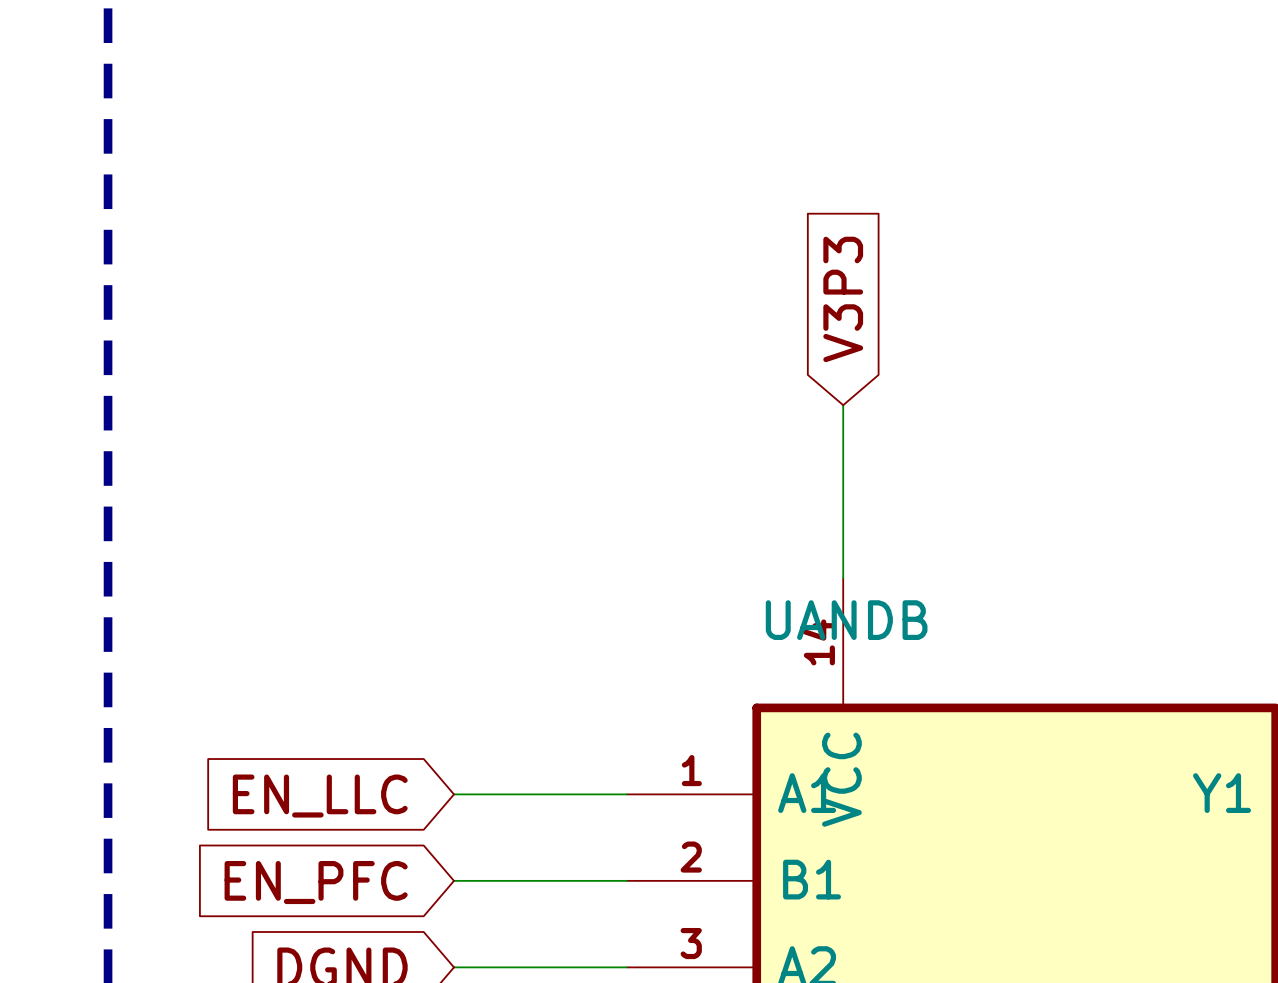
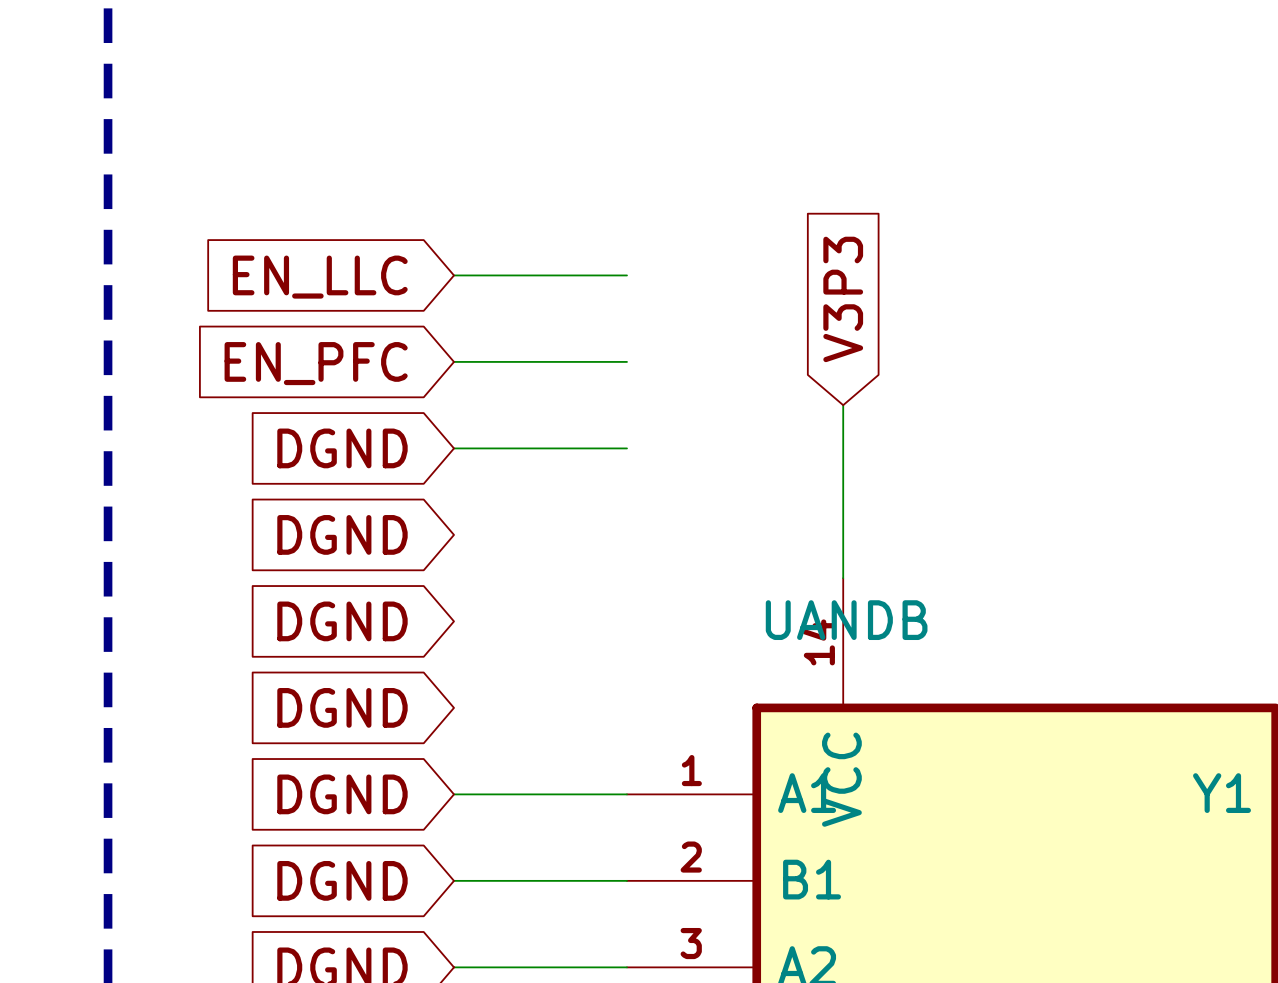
wire: none -> (454, 275) (626, 275)
global label: none -> EN_LLC (320, 277)
wire: none -> (454, 361) (626, 361)
global label: none -> EN_PFC (316, 363)
global label: none -> DGND (342, 448)
wire: none -> (454, 448) (626, 448)
global label: none -> DGND (342, 534)
global label: none -> DGND (342, 621)
global label: none -> DGND (342, 707)
global label: EN_LLC (320, 796) -> DGND (342, 794)
global label: EN_PFC (316, 882) -> DGND (342, 880)

